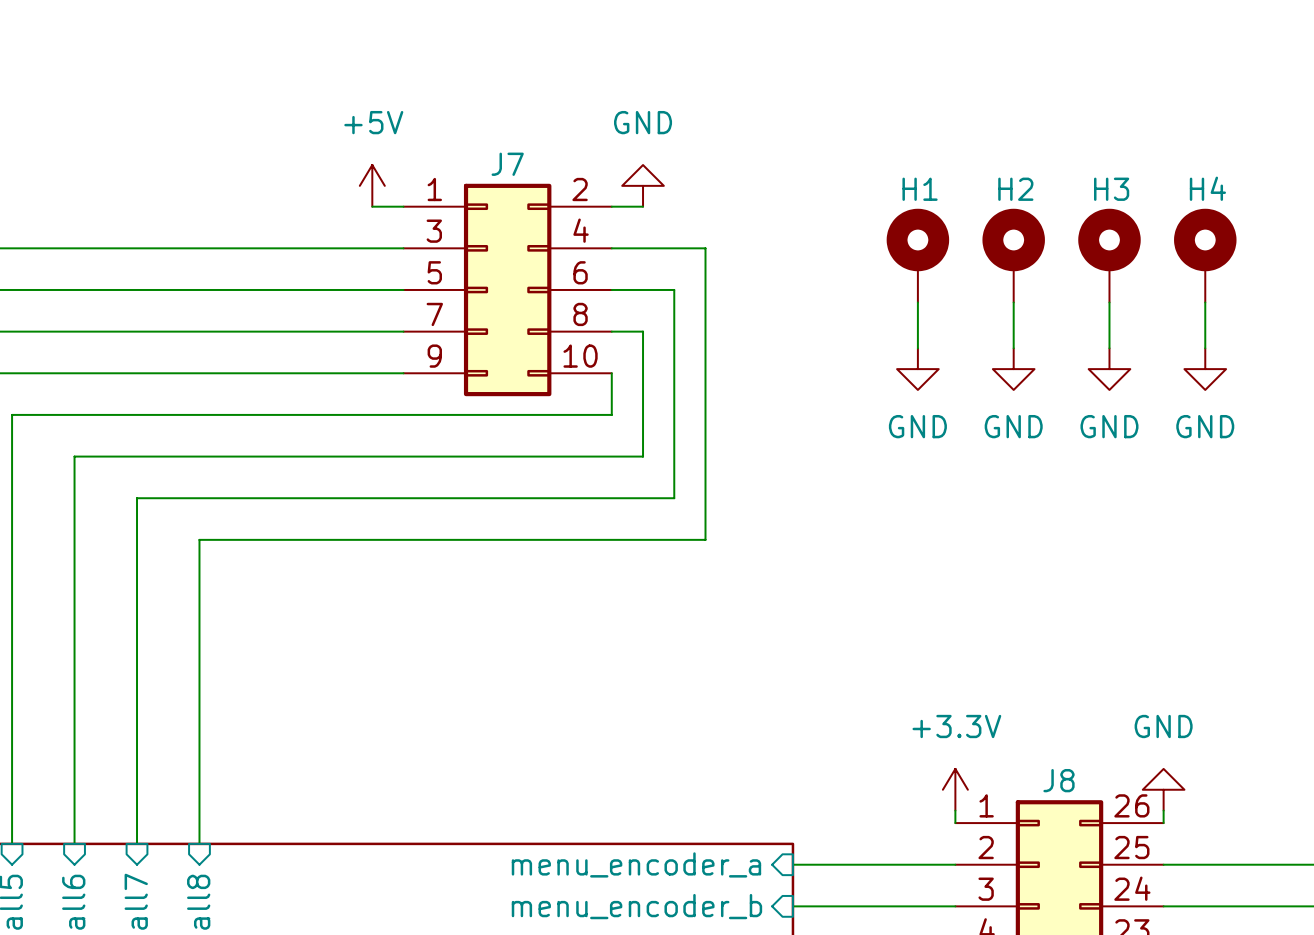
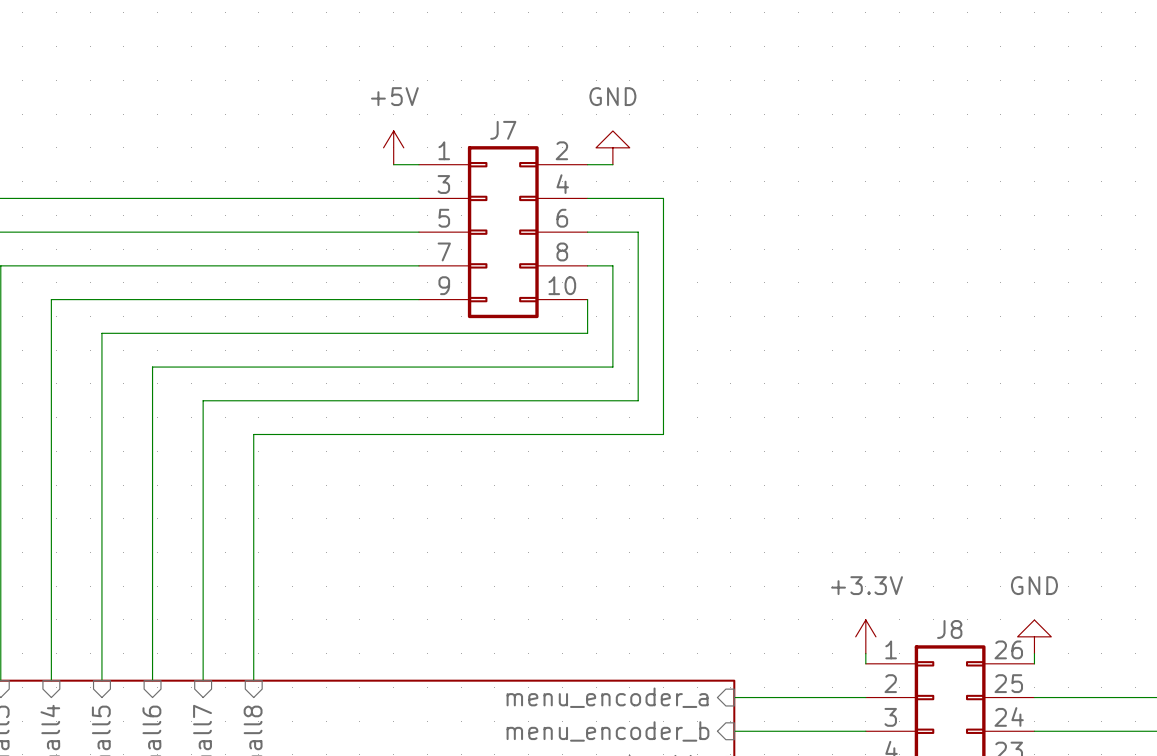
H1: (917, 255) -> none
H2: (1013, 255) -> none
H3: (1109, 255) -> none
H4: (1205, 255) -> none
wire: (917, 302) (917, 348) -> none
wire: (1013, 302) (1013, 348) -> none
wire: (1109, 302) (1109, 348) -> none
wire: (1205, 302) (1205, 348) -> none
power symbol: GND (917, 369) -> none
power symbol: GND (1013, 369) -> none
power symbol: GND (1109, 369) -> none
power symbol: GND (1205, 369) -> none

